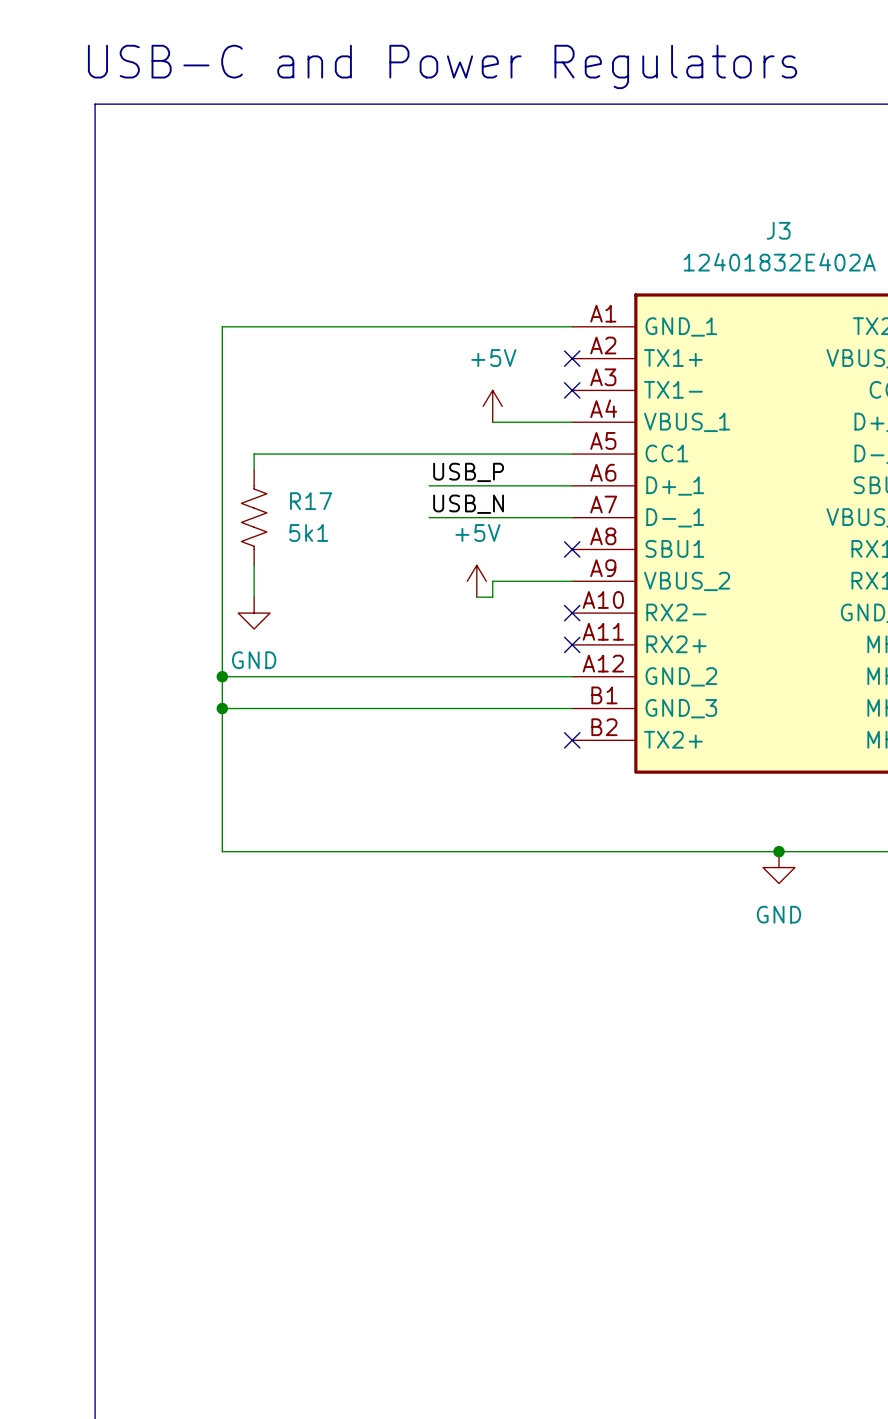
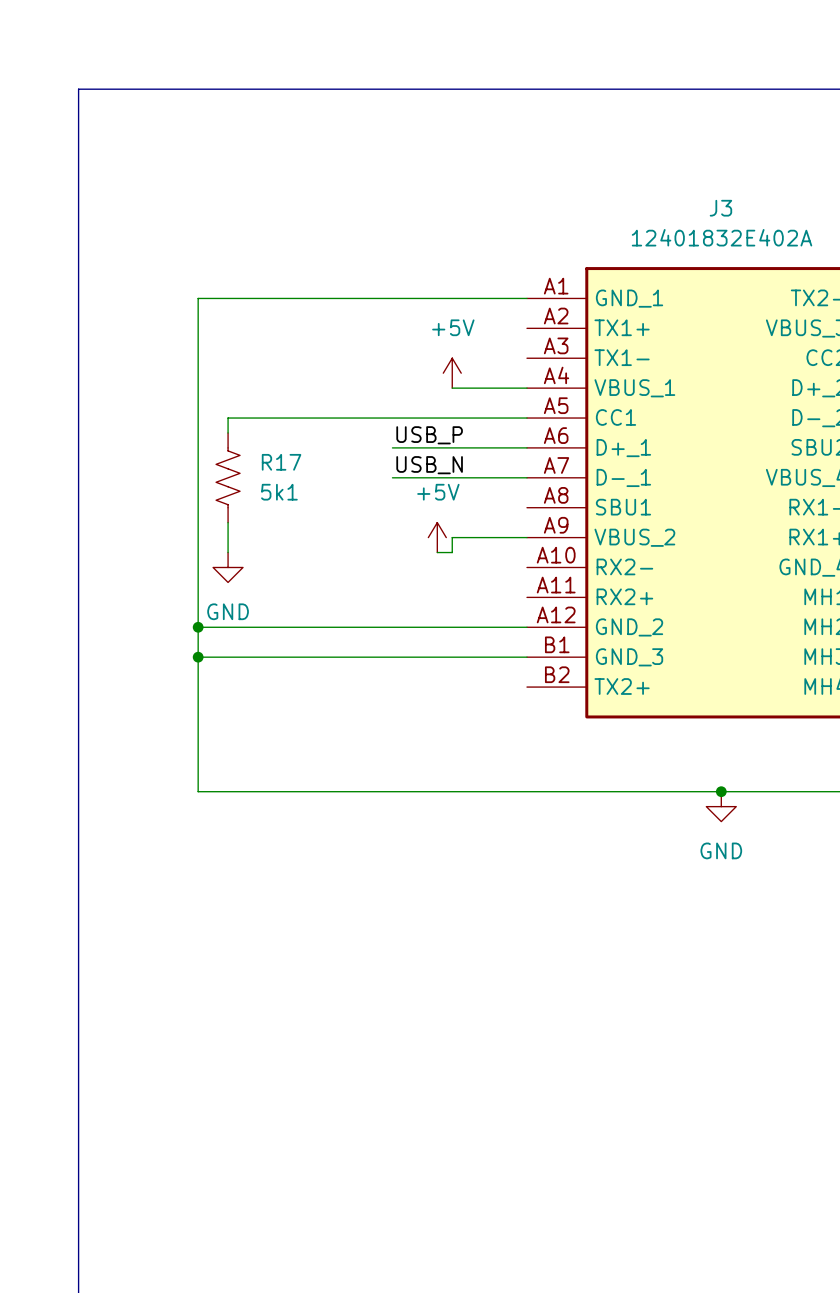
text: USB-C and Power Regulators (442, 66) -> none
no-connect mark: (572, 358) -> none
no-connect mark: (572, 390) -> none
no-connect mark: (572, 549) -> none
no-connect mark: (572, 613) -> none
no-connect mark: (572, 644) -> none
no-connect mark: (572, 740) -> none

